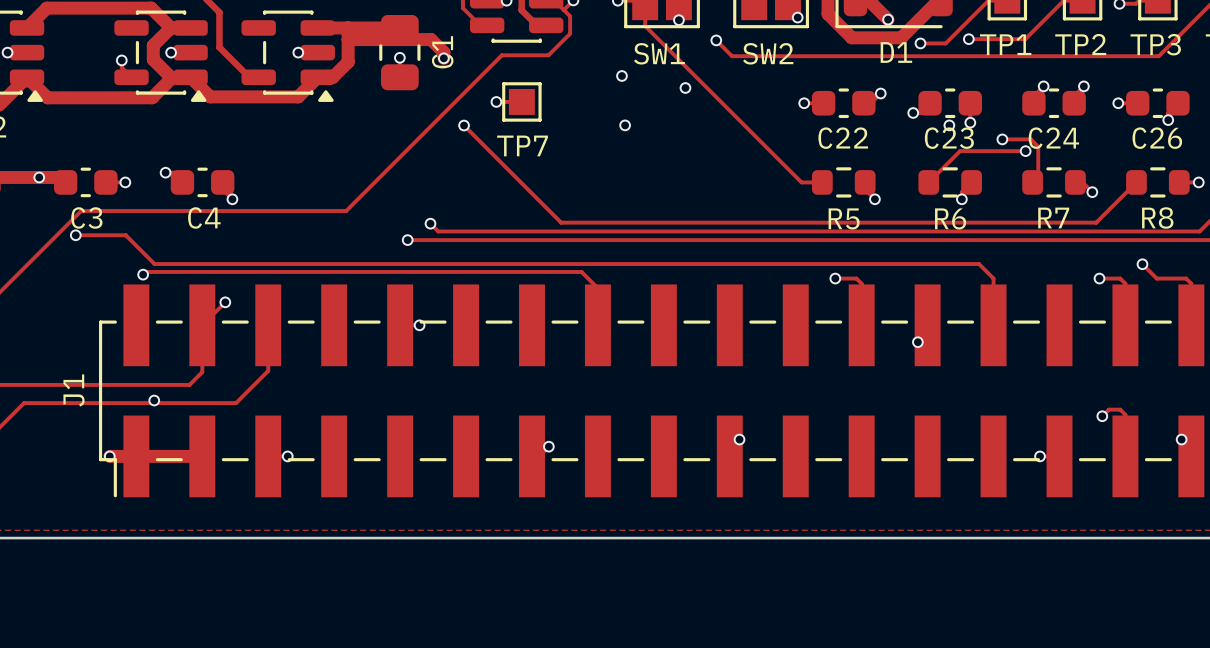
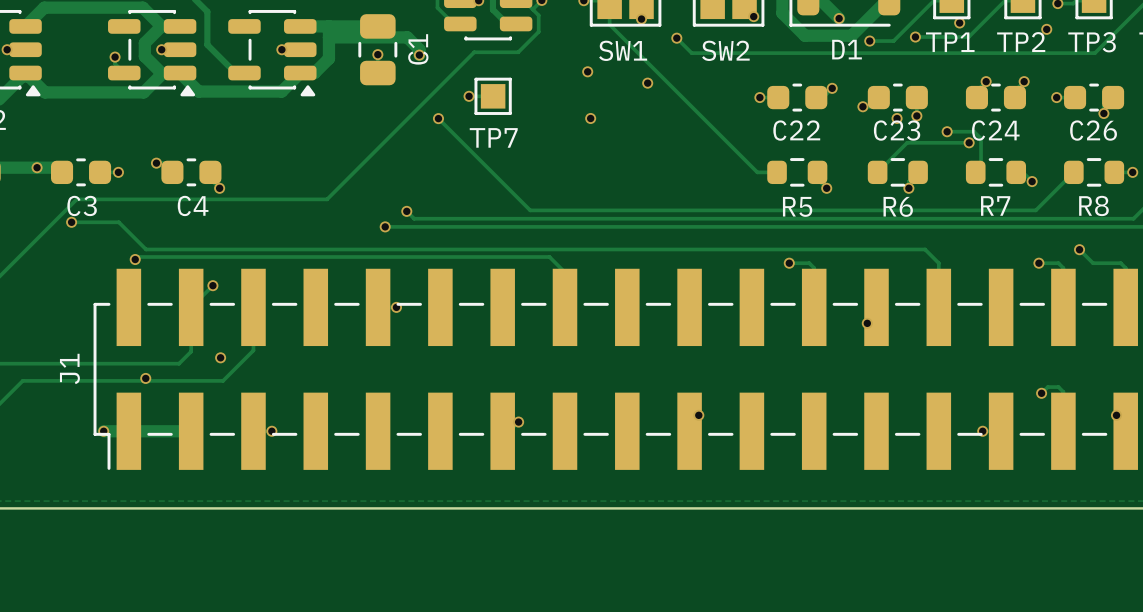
via: none -> (959, 22)
via: none -> (1046, 29)
via: none -> (220, 357)

